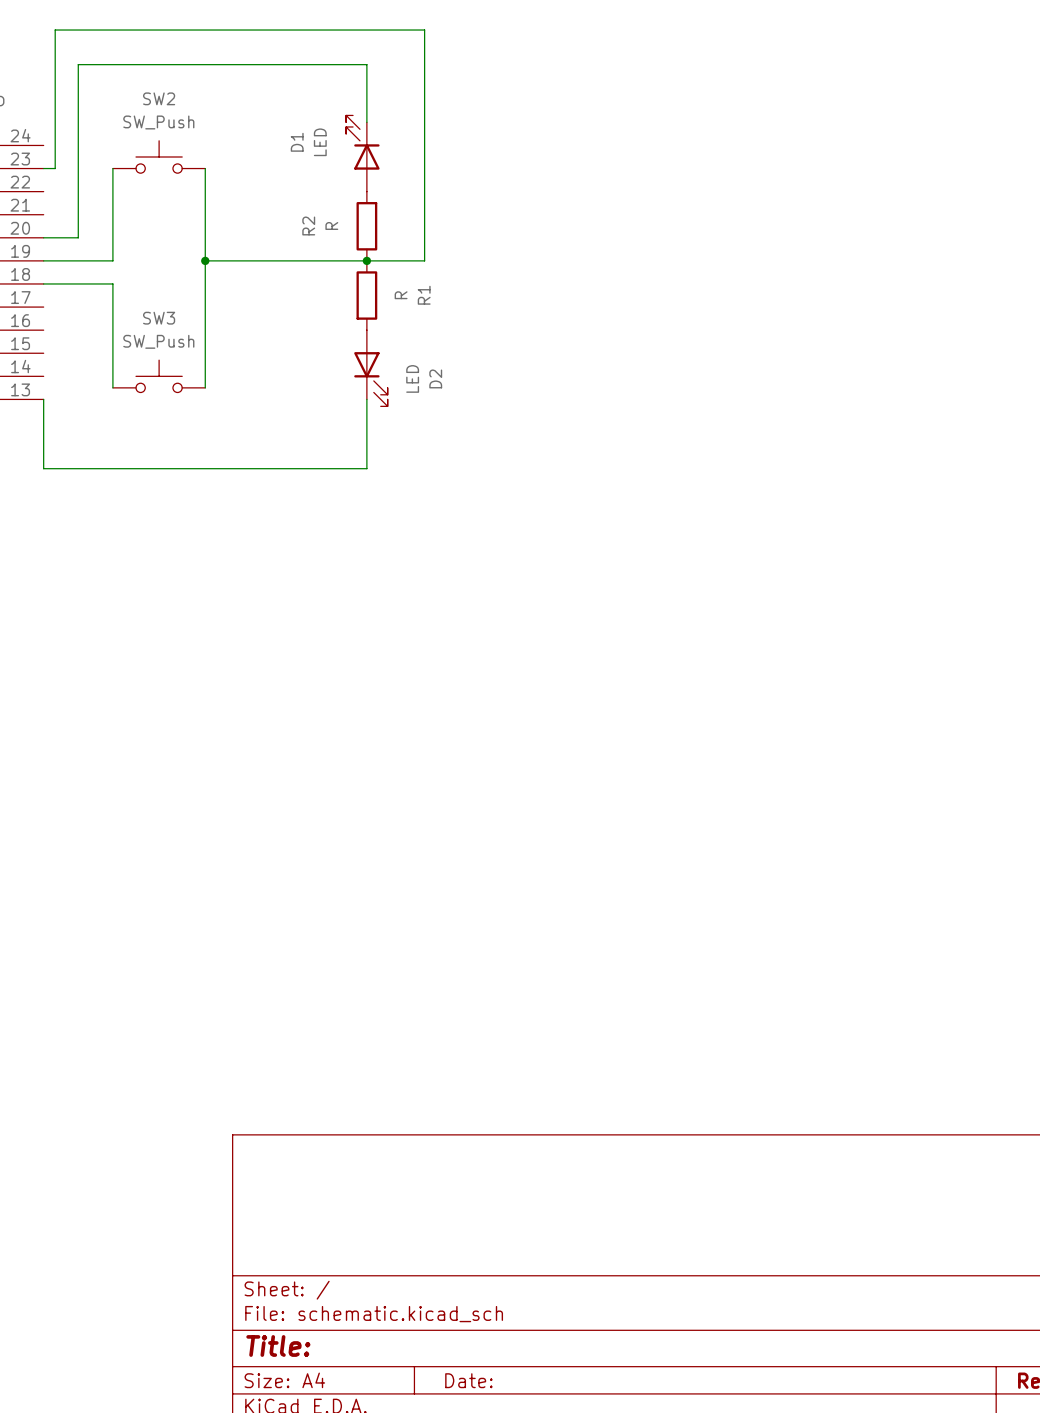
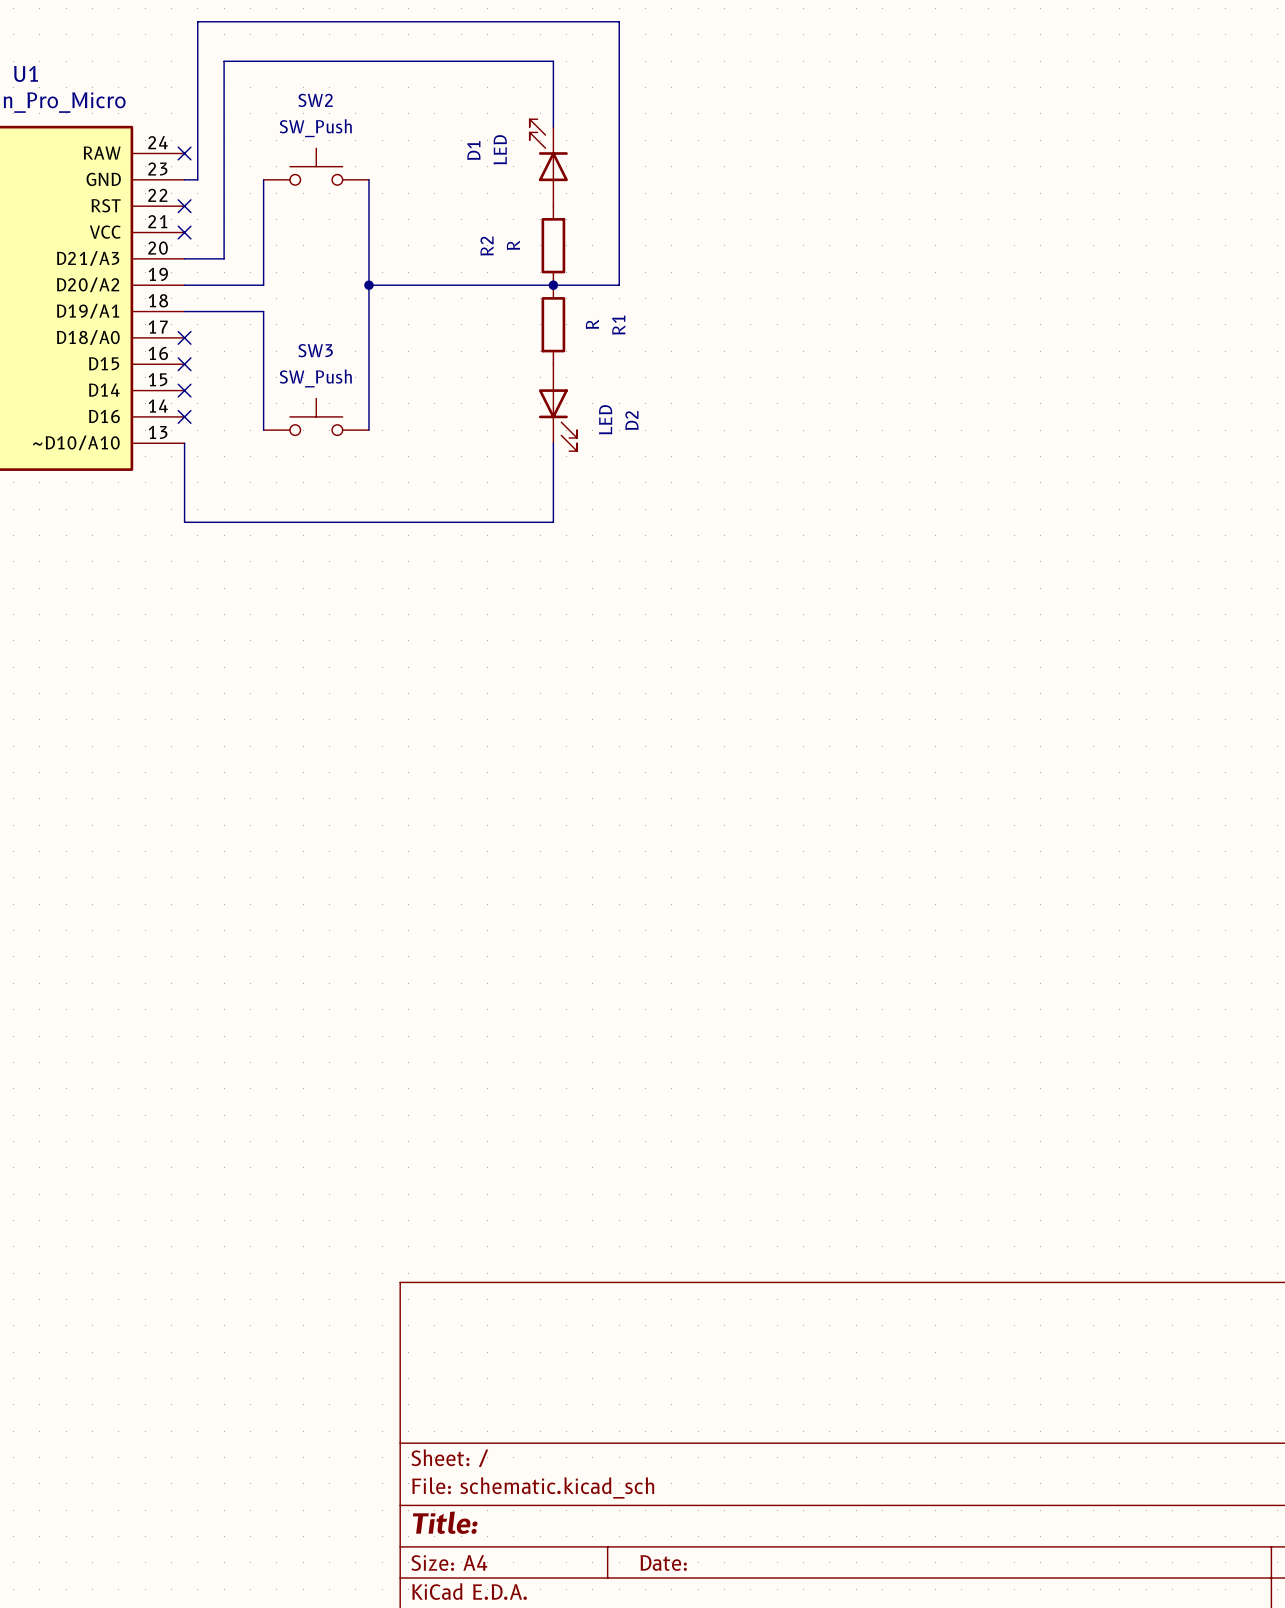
no-connect mark: none -> (184, 153)
no-connect mark: none -> (184, 206)
no-connect mark: none -> (184, 232)
no-connect mark: none -> (184, 337)
no-connect mark: none -> (184, 364)
no-connect mark: none -> (184, 390)
no-connect mark: none -> (184, 416)

